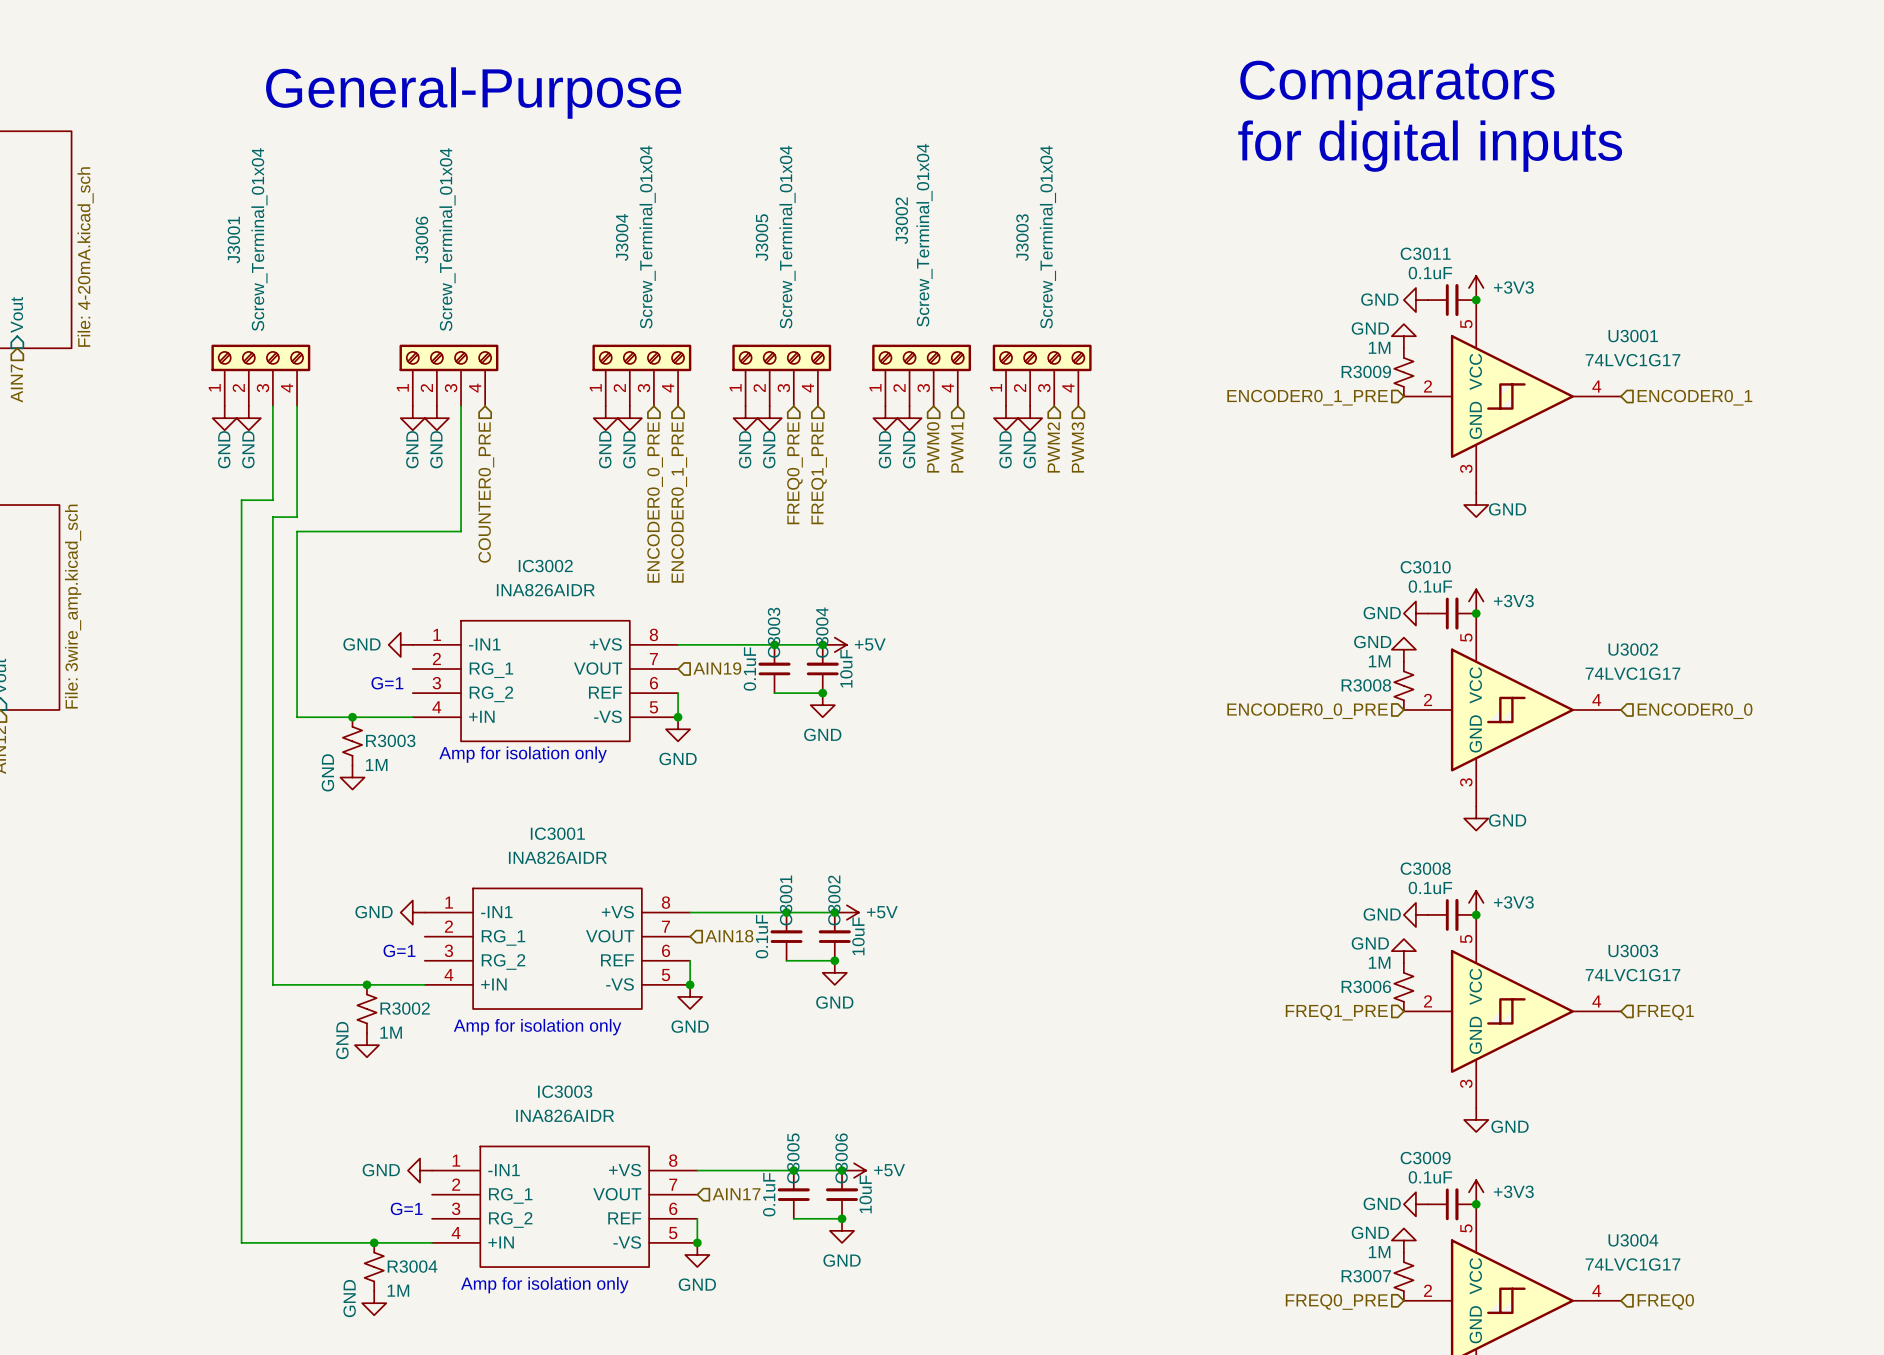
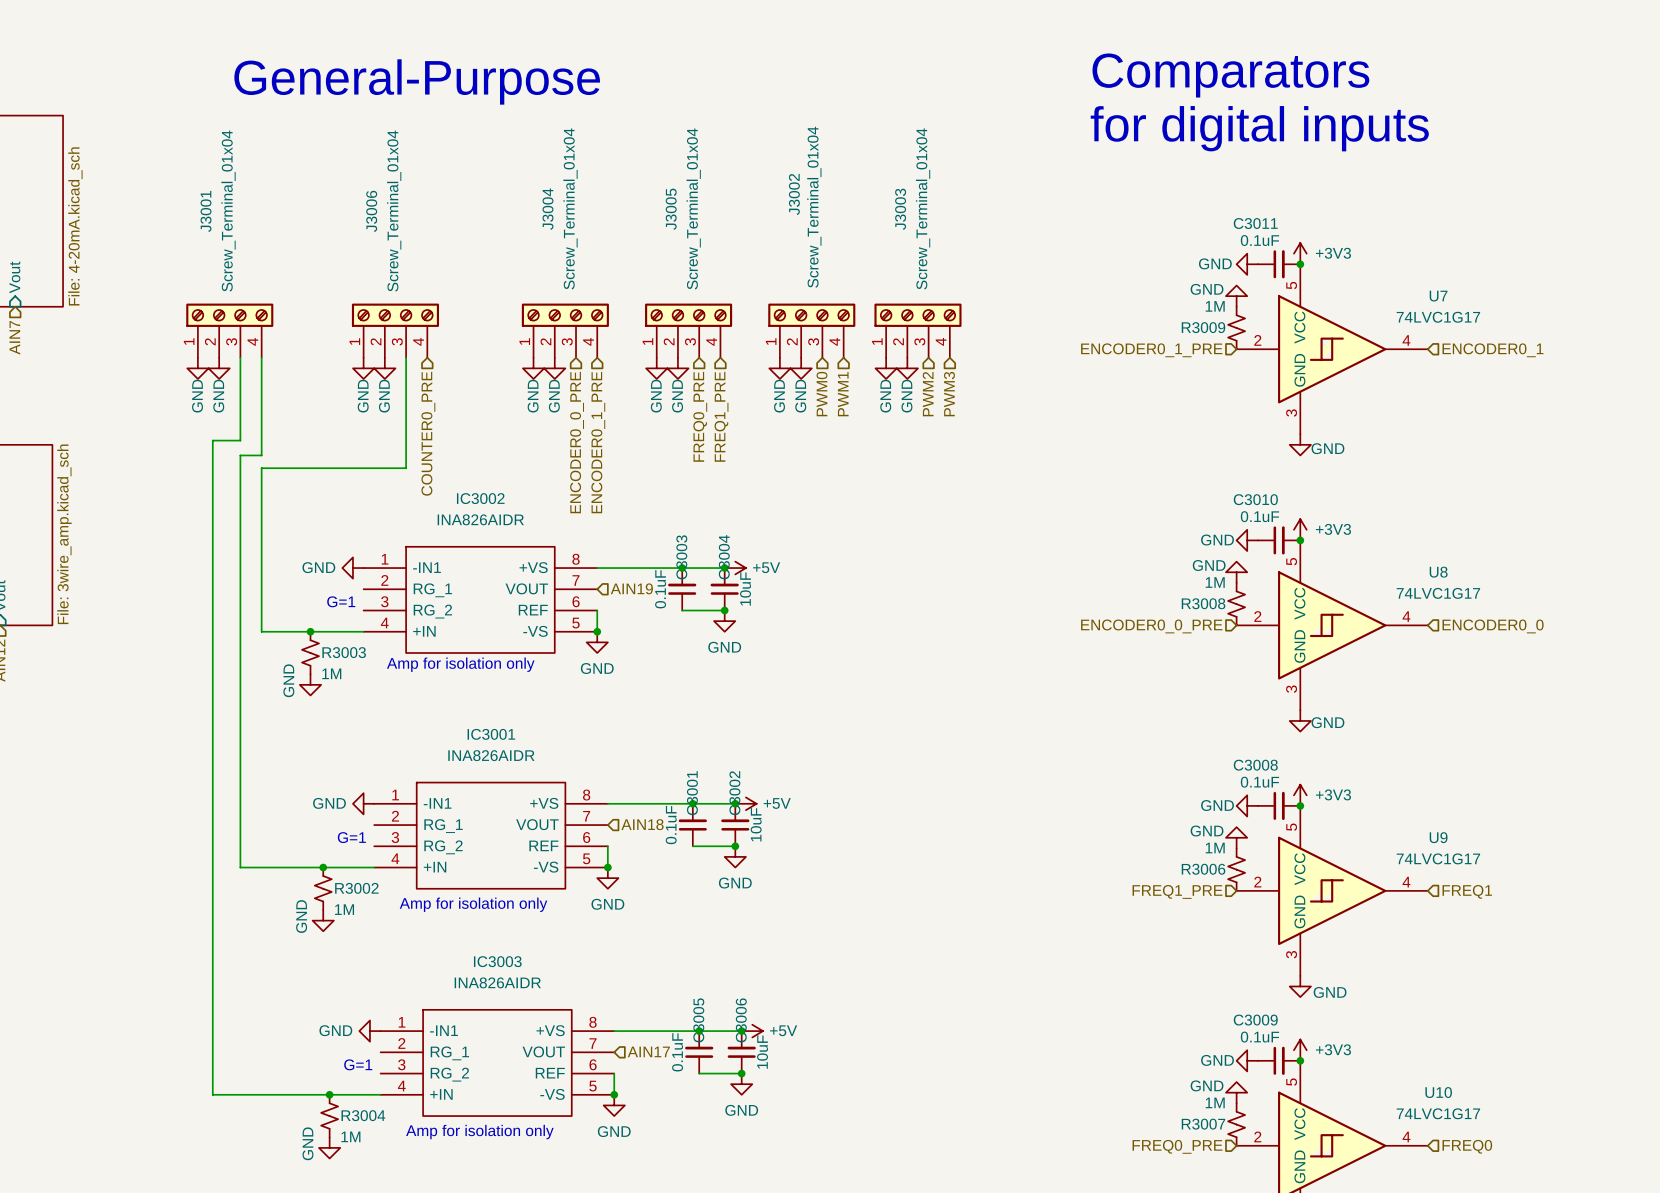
U3001 name: U3001 (1633, 336) -> U7 (1438, 296)
U3002 name: U3002 (1633, 649) -> U8 (1438, 572)
U3003 name: U3003 (1633, 950) -> U9 (1438, 837)
U3004 name: U3004 (1633, 1240) -> U10 (1438, 1092)

